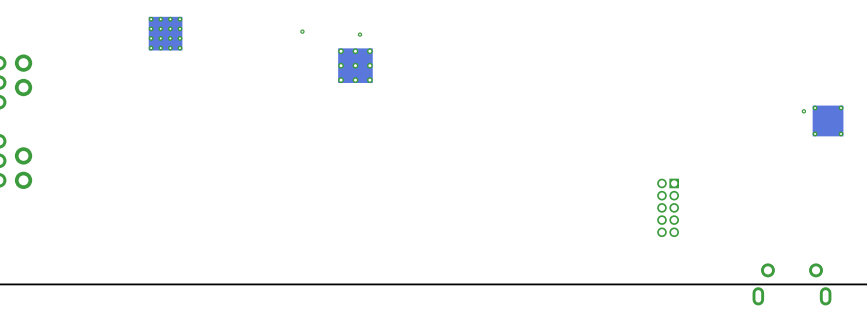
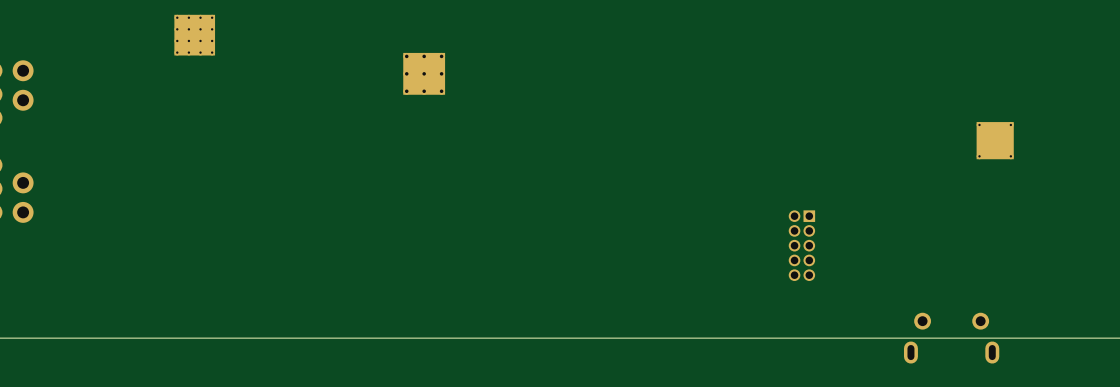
via: (302, 31) -> none
via: (359, 34) -> none
via: (803, 111) -> none

